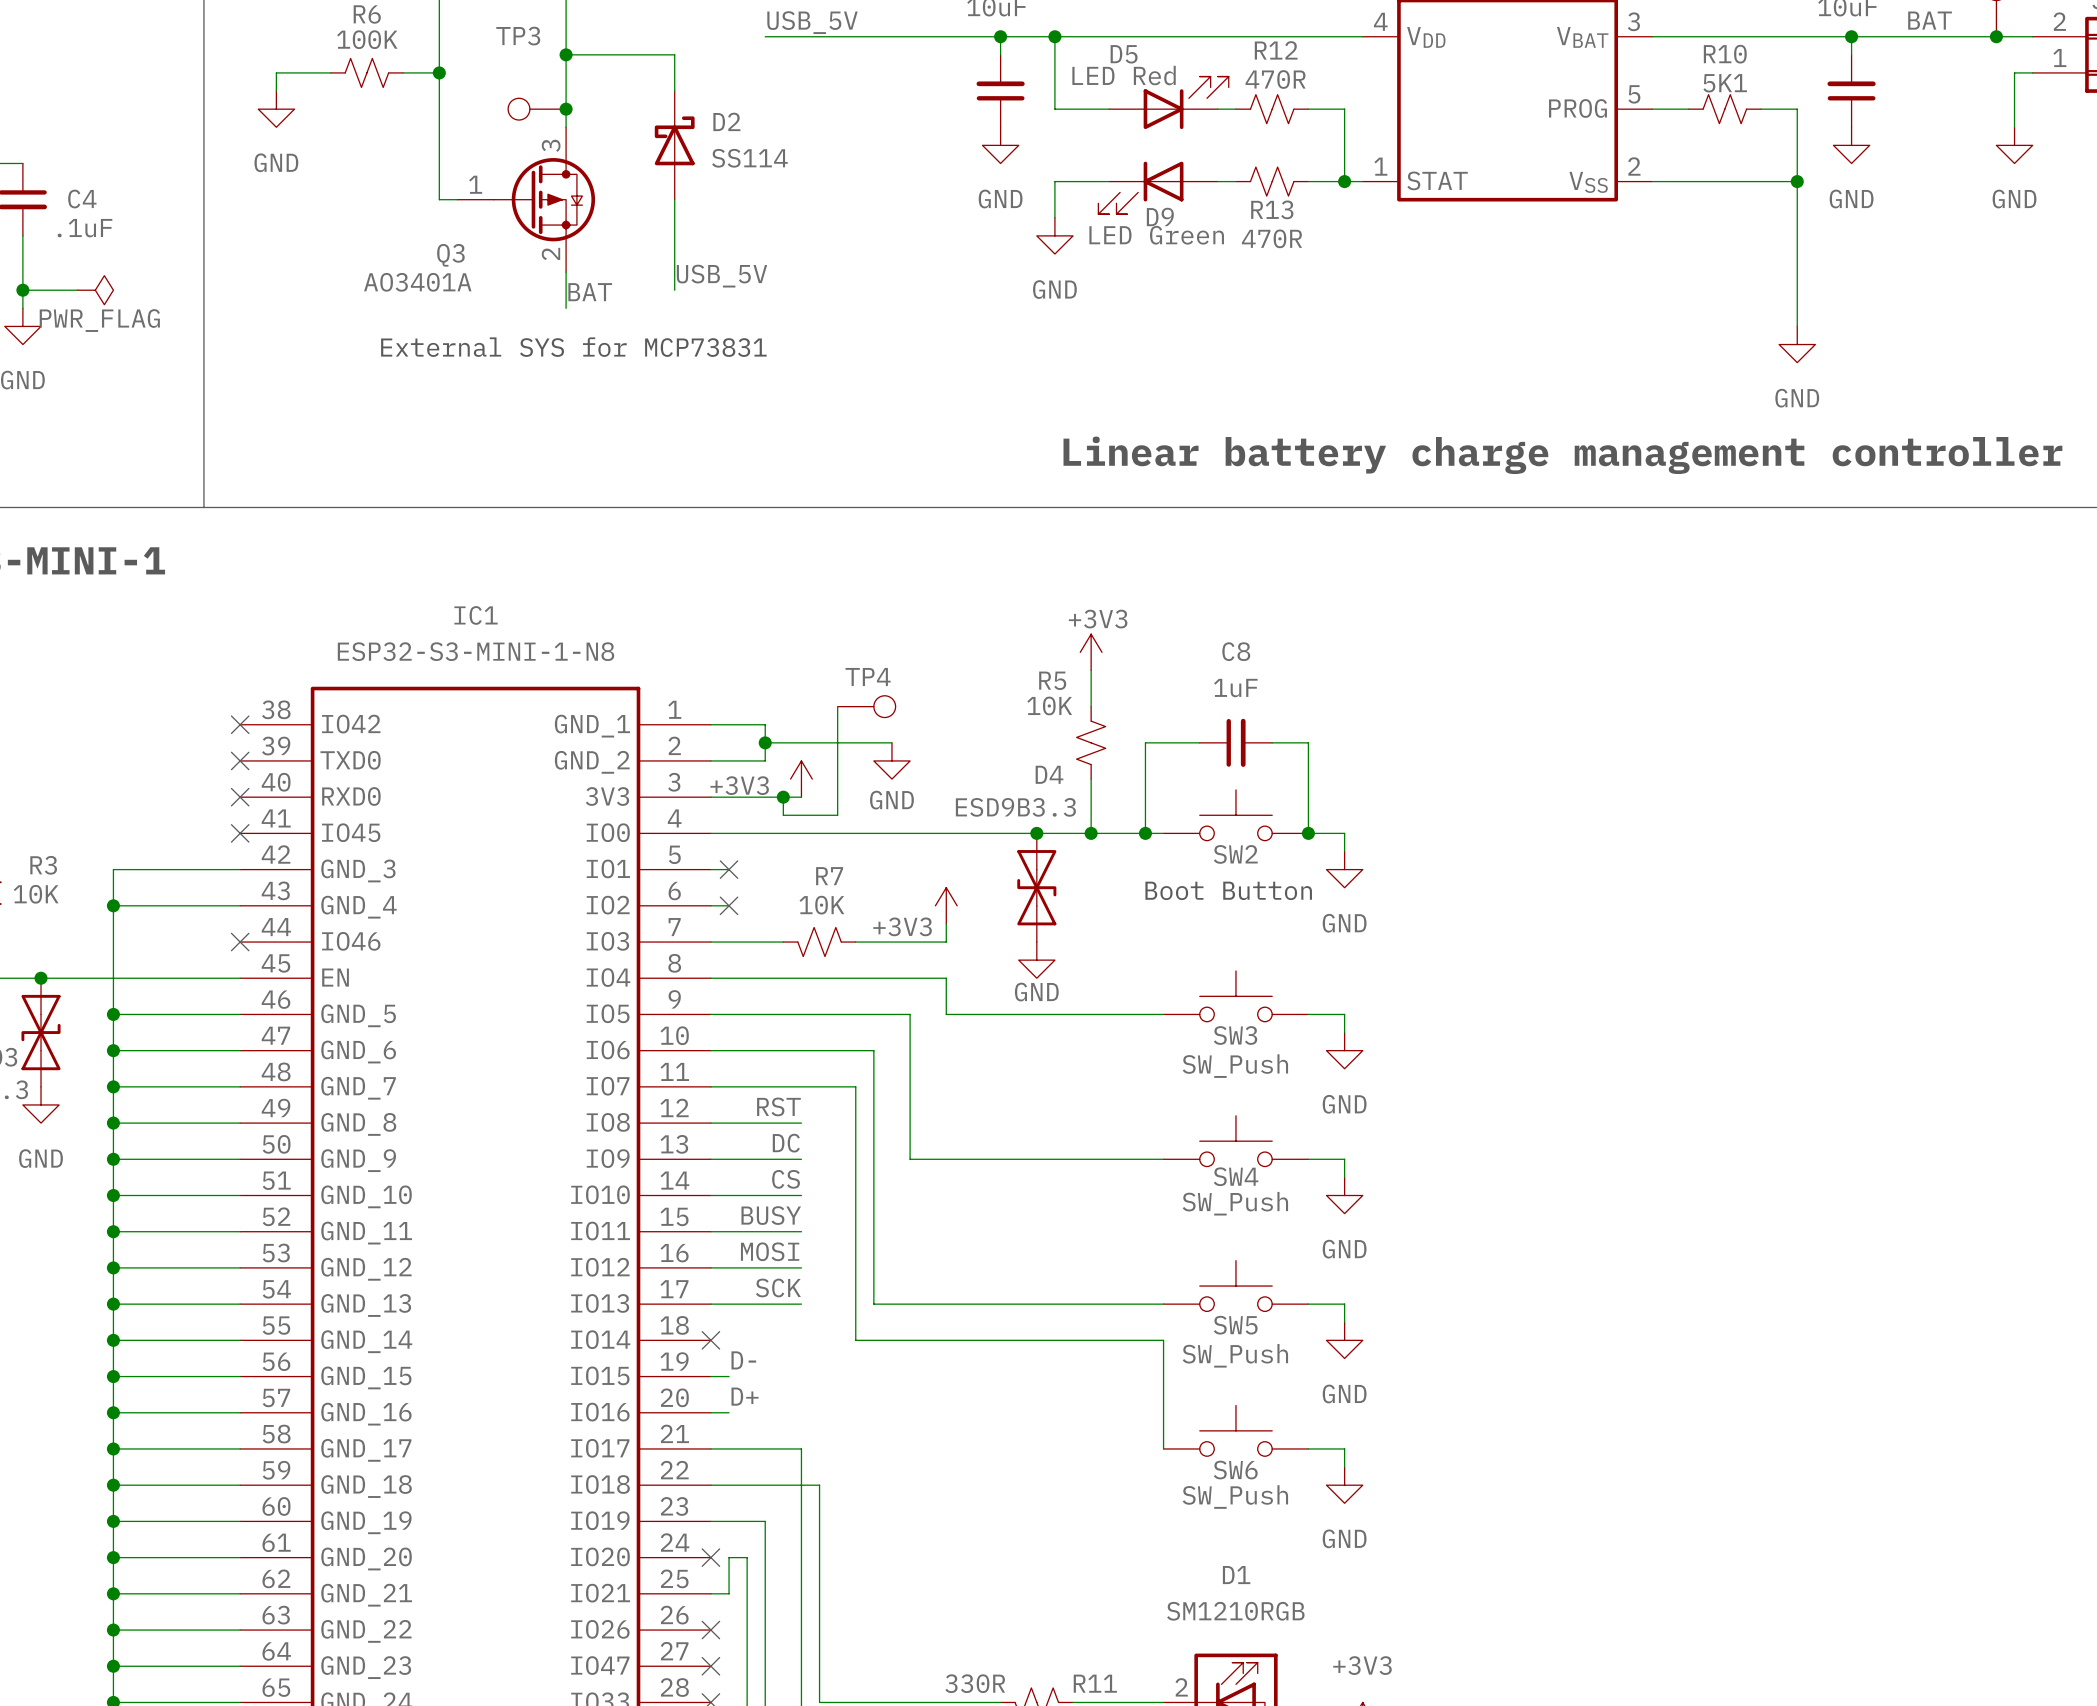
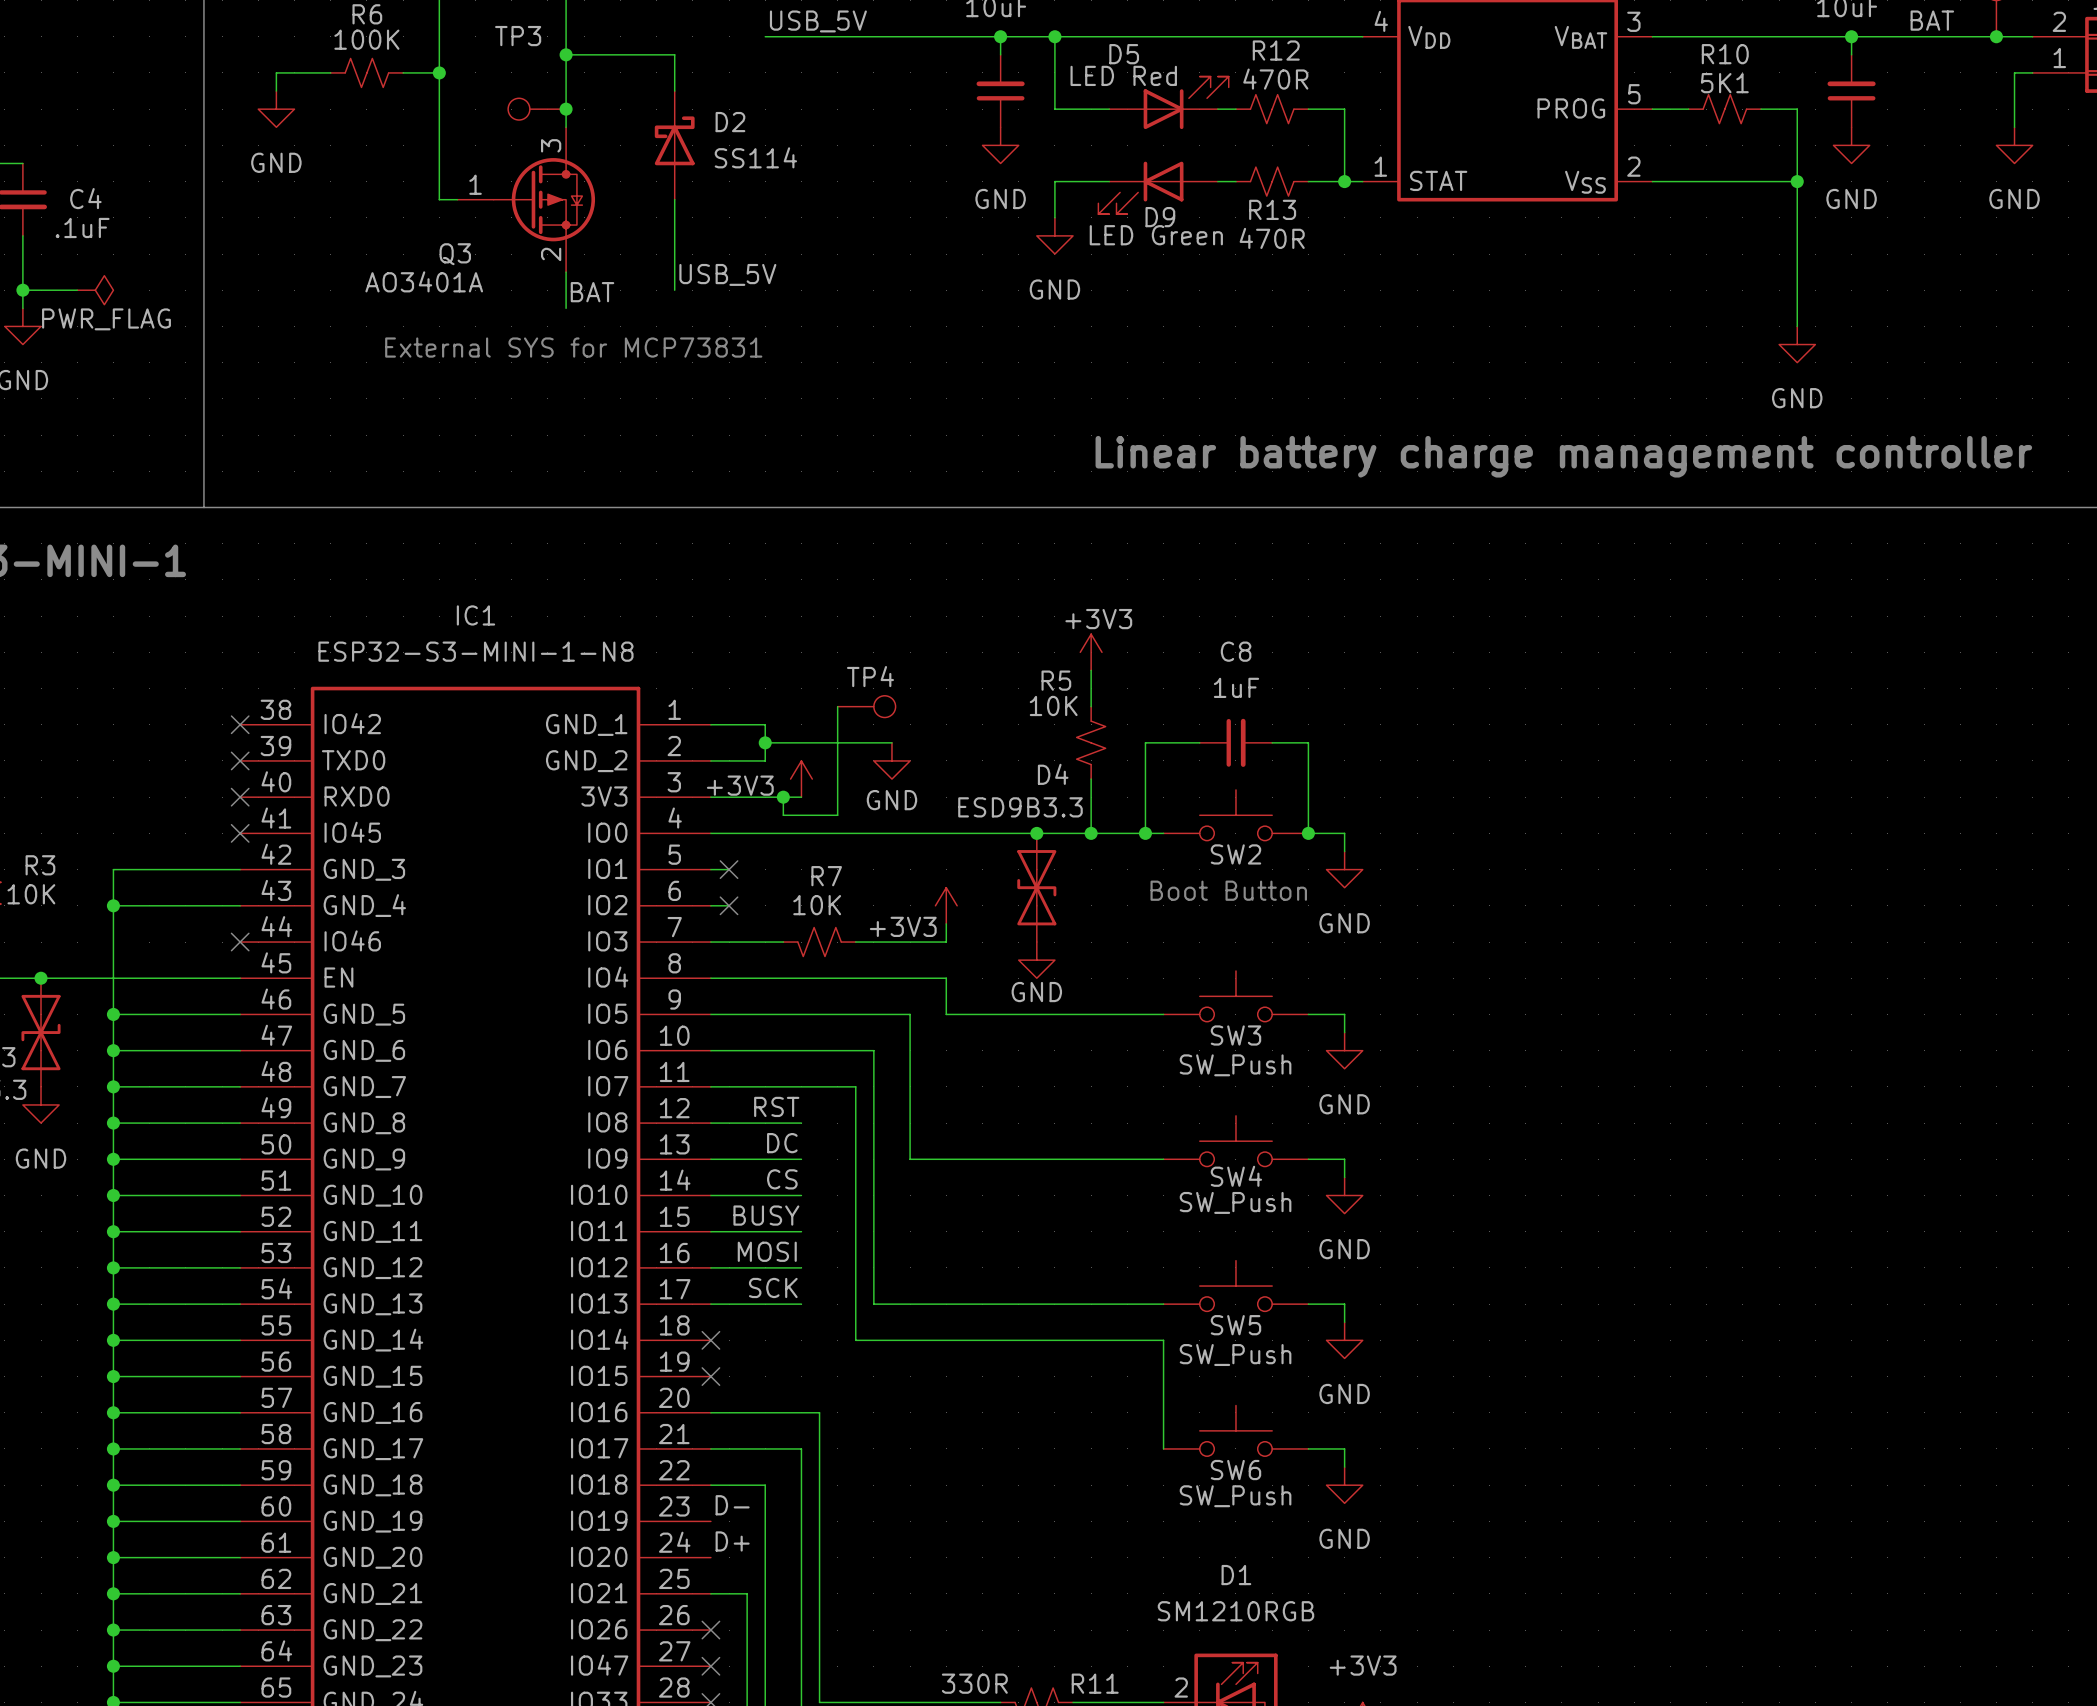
label position: D- (743, 1360) -> D- (732, 1505)
wire: (710, 1376) (729, 1376) -> none
no-connect mark: none -> (710, 1376)
label position: D+ (745, 1396) -> D+ (732, 1541)
wire: none -> (729, 1412) (819, 1412) (819, 1485)
wire: (765, 1485) (819, 1485) -> (765, 1485) (765, 1521)
wire: (710, 1521) (765, 1521) -> none
no-connect mark: (710, 1557) -> none
wire: (729, 1593) (729, 1557) (747, 1557) (747, 1593) -> (729, 1593) (747, 1593)

